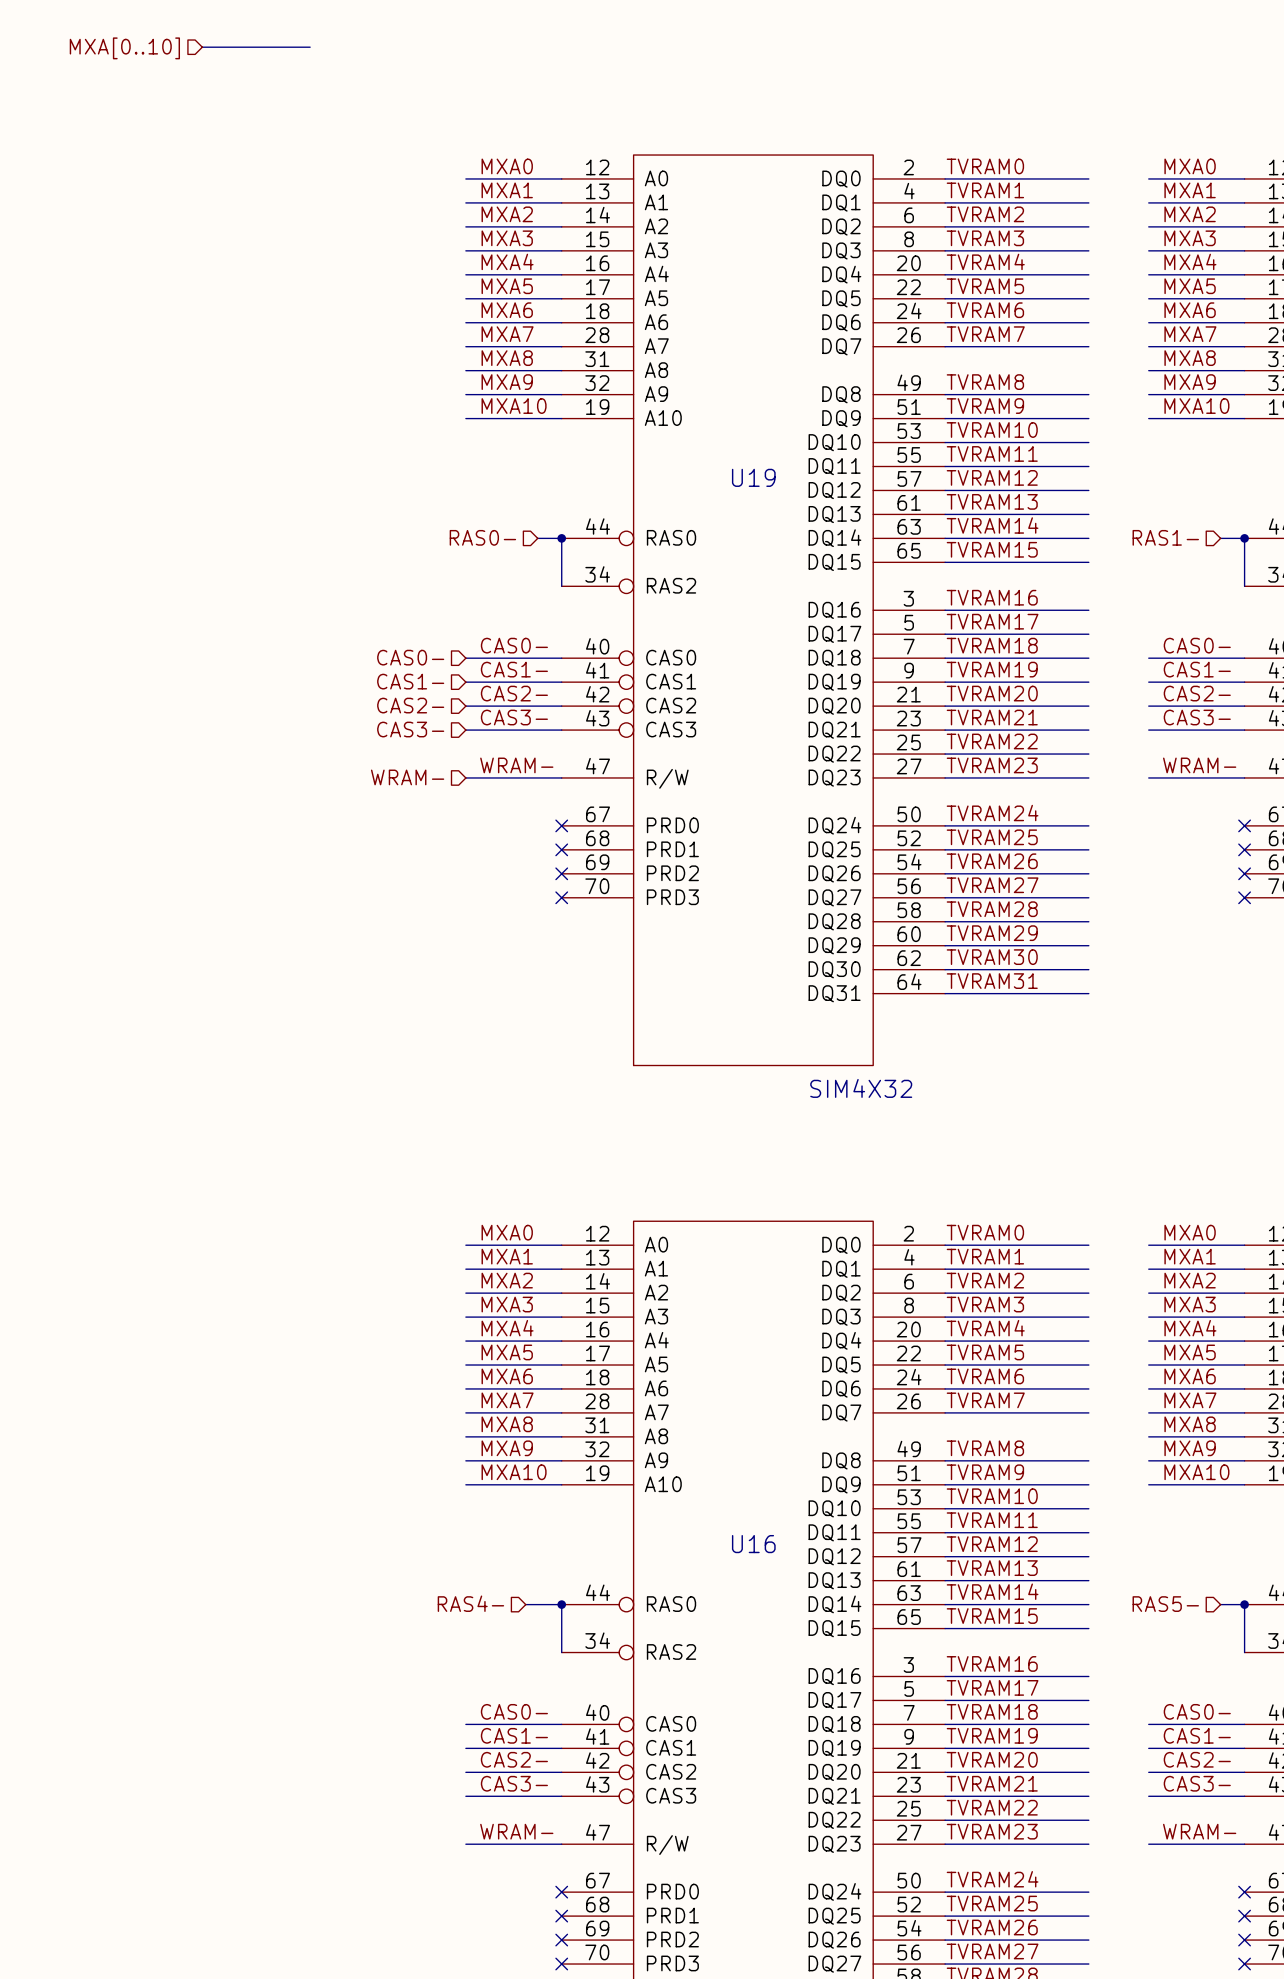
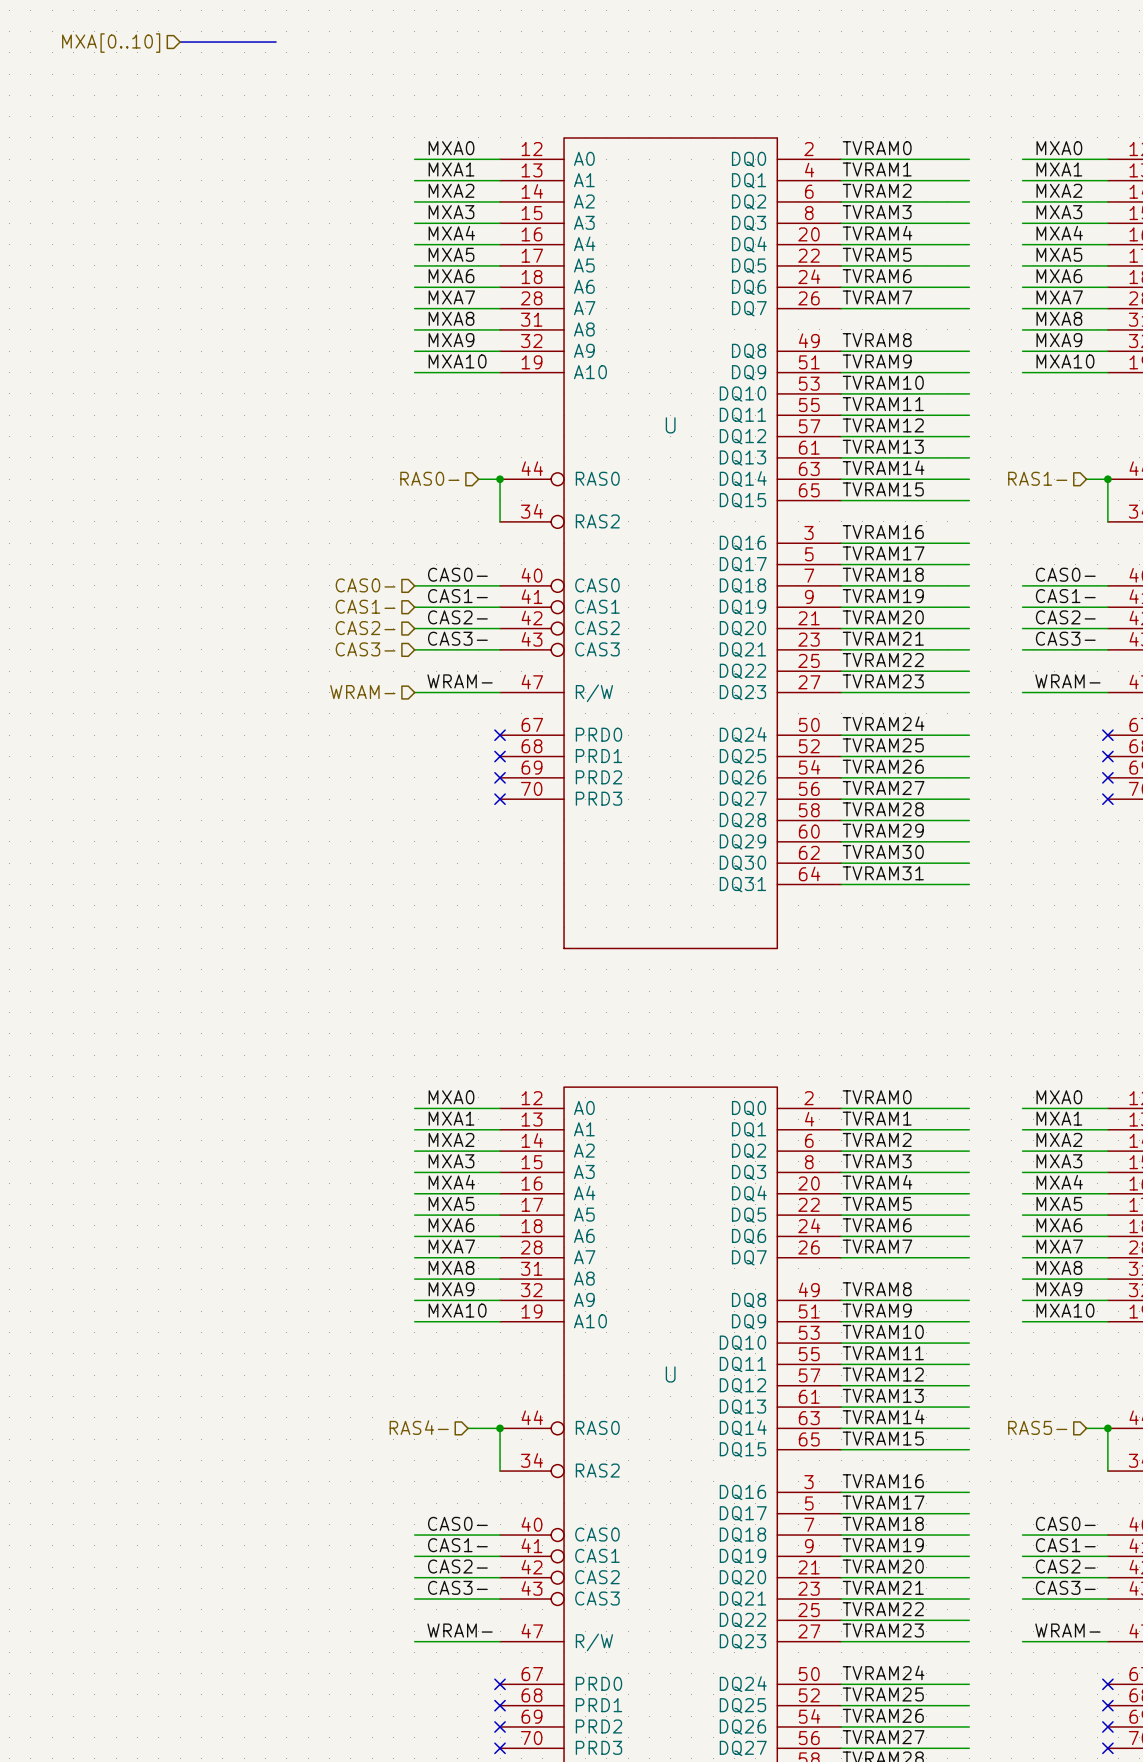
U19 name: U19 (753, 477) -> U (670, 425)
U19 value: SIM4X32 (861, 1088) -> none
U16 name: U16 (753, 1544) -> U (670, 1374)

